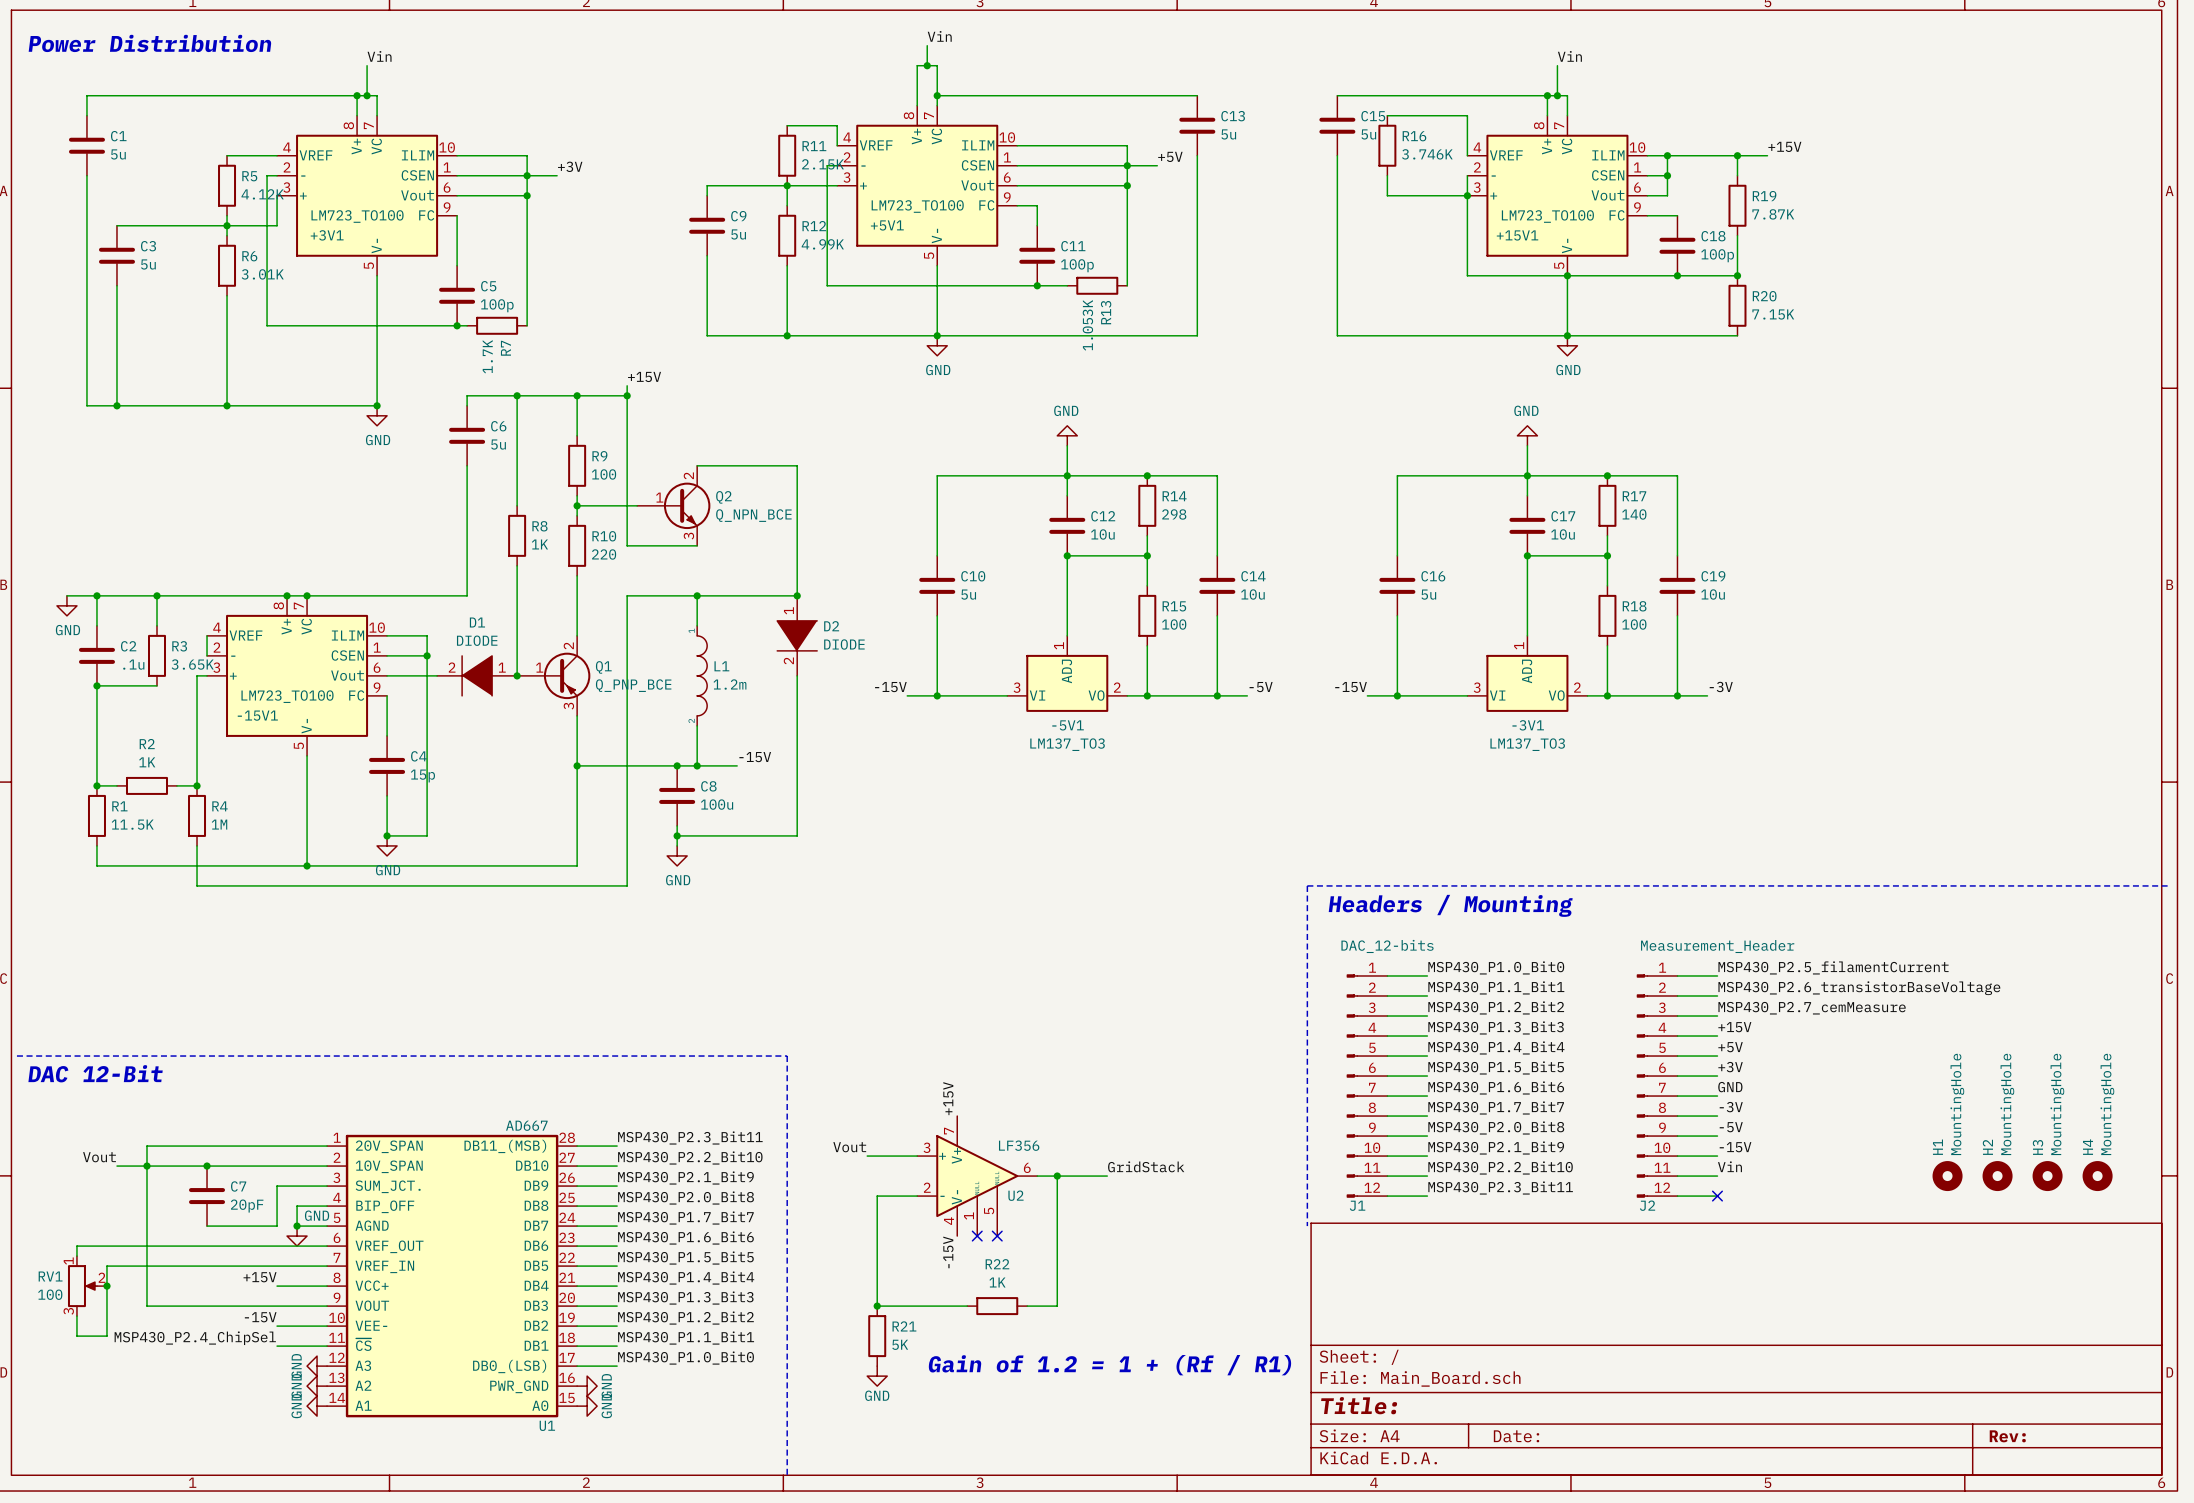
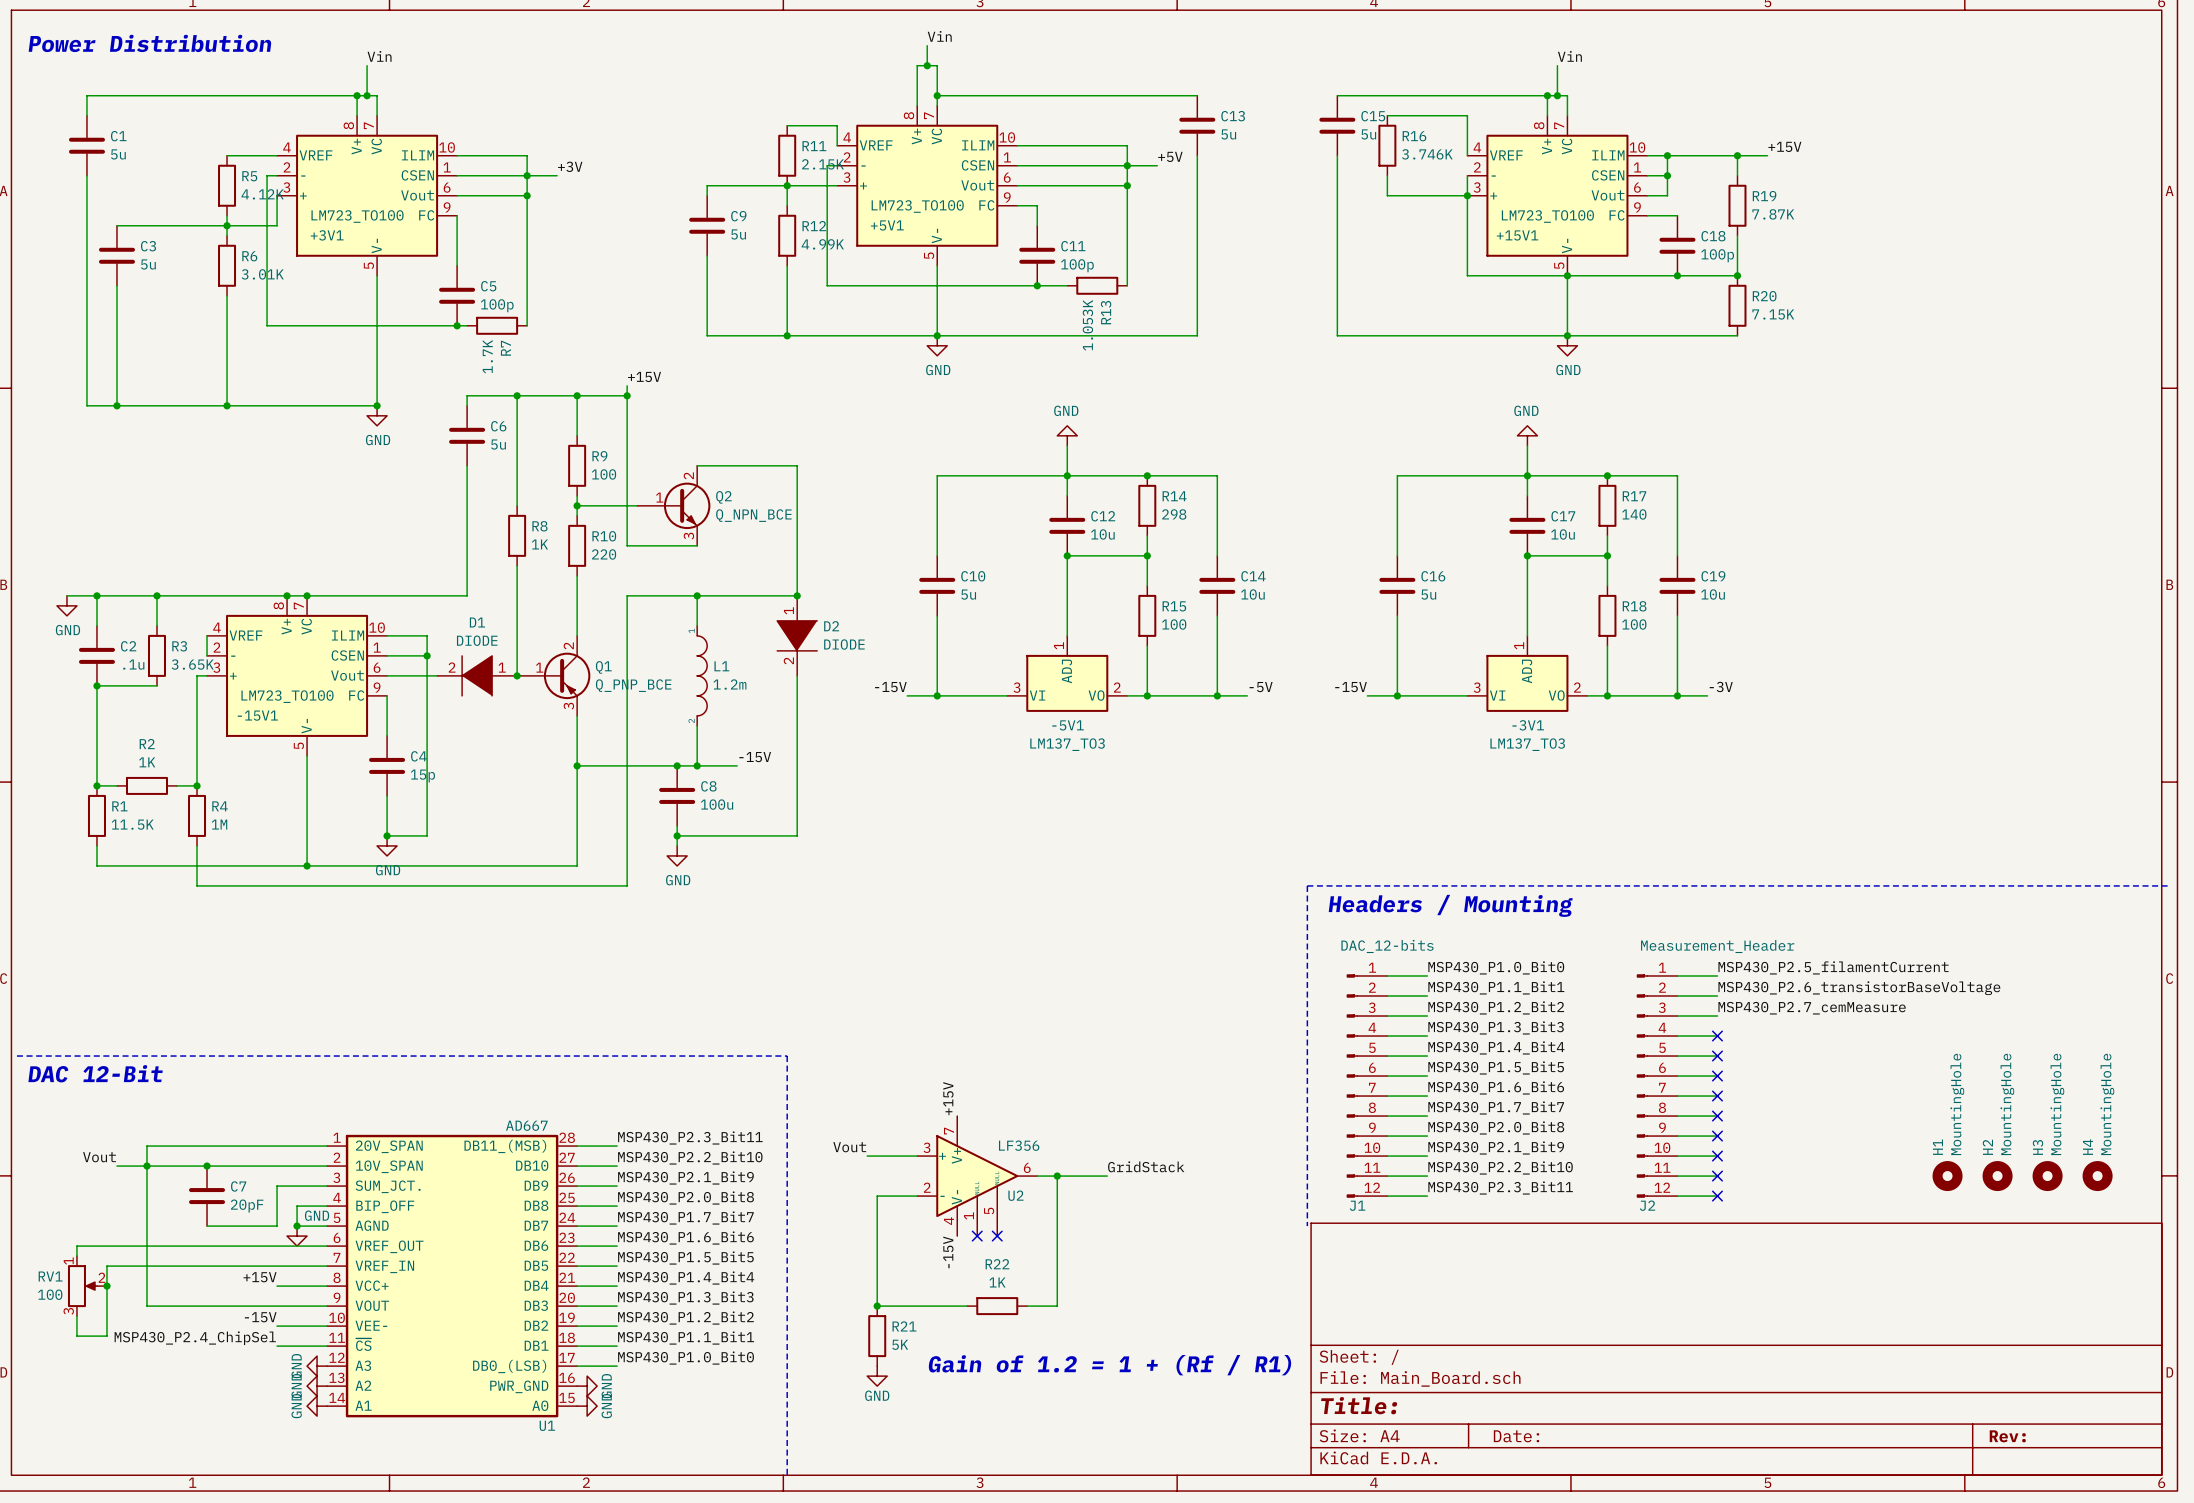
label: +15V (1734, 1027) -> none
no-connect mark: none -> (1717, 1036)
label: +5V (1730, 1047) -> none
no-connect mark: none -> (1717, 1056)
label: +3V (1730, 1067) -> none
no-connect mark: none -> (1717, 1076)
label: GND (1730, 1087) -> none
no-connect mark: none -> (1717, 1096)
label: -3V (1731, 1107) -> none
no-connect mark: none -> (1717, 1116)
label: -5V (1731, 1127) -> none
no-connect mark: none -> (1717, 1136)
label: -15V (1735, 1147) -> none
no-connect mark: none -> (1717, 1156)
label: Vin (1729, 1166) -> none
no-connect mark: none -> (1717, 1176)

